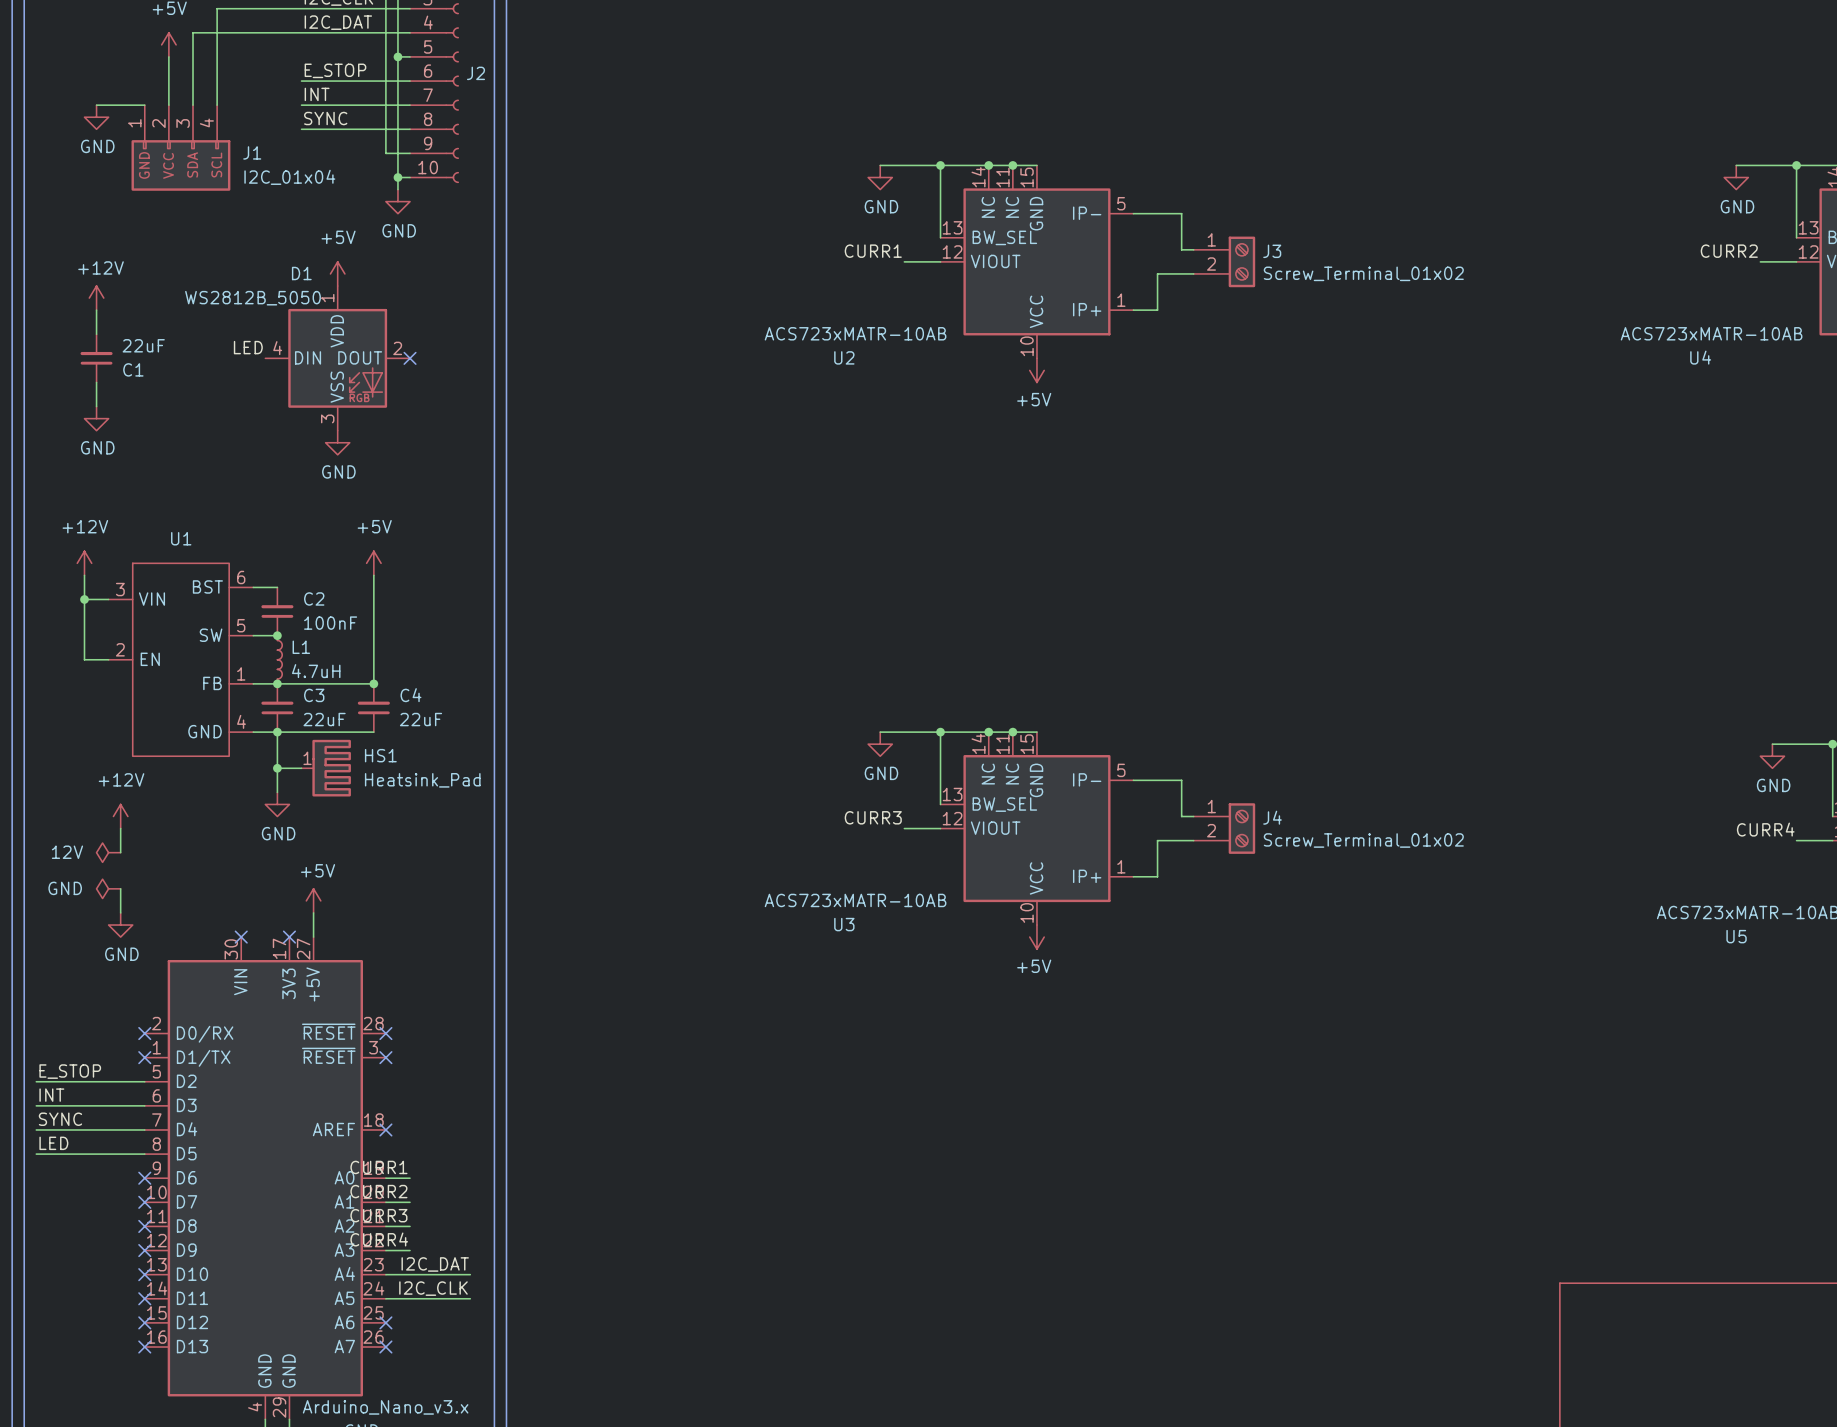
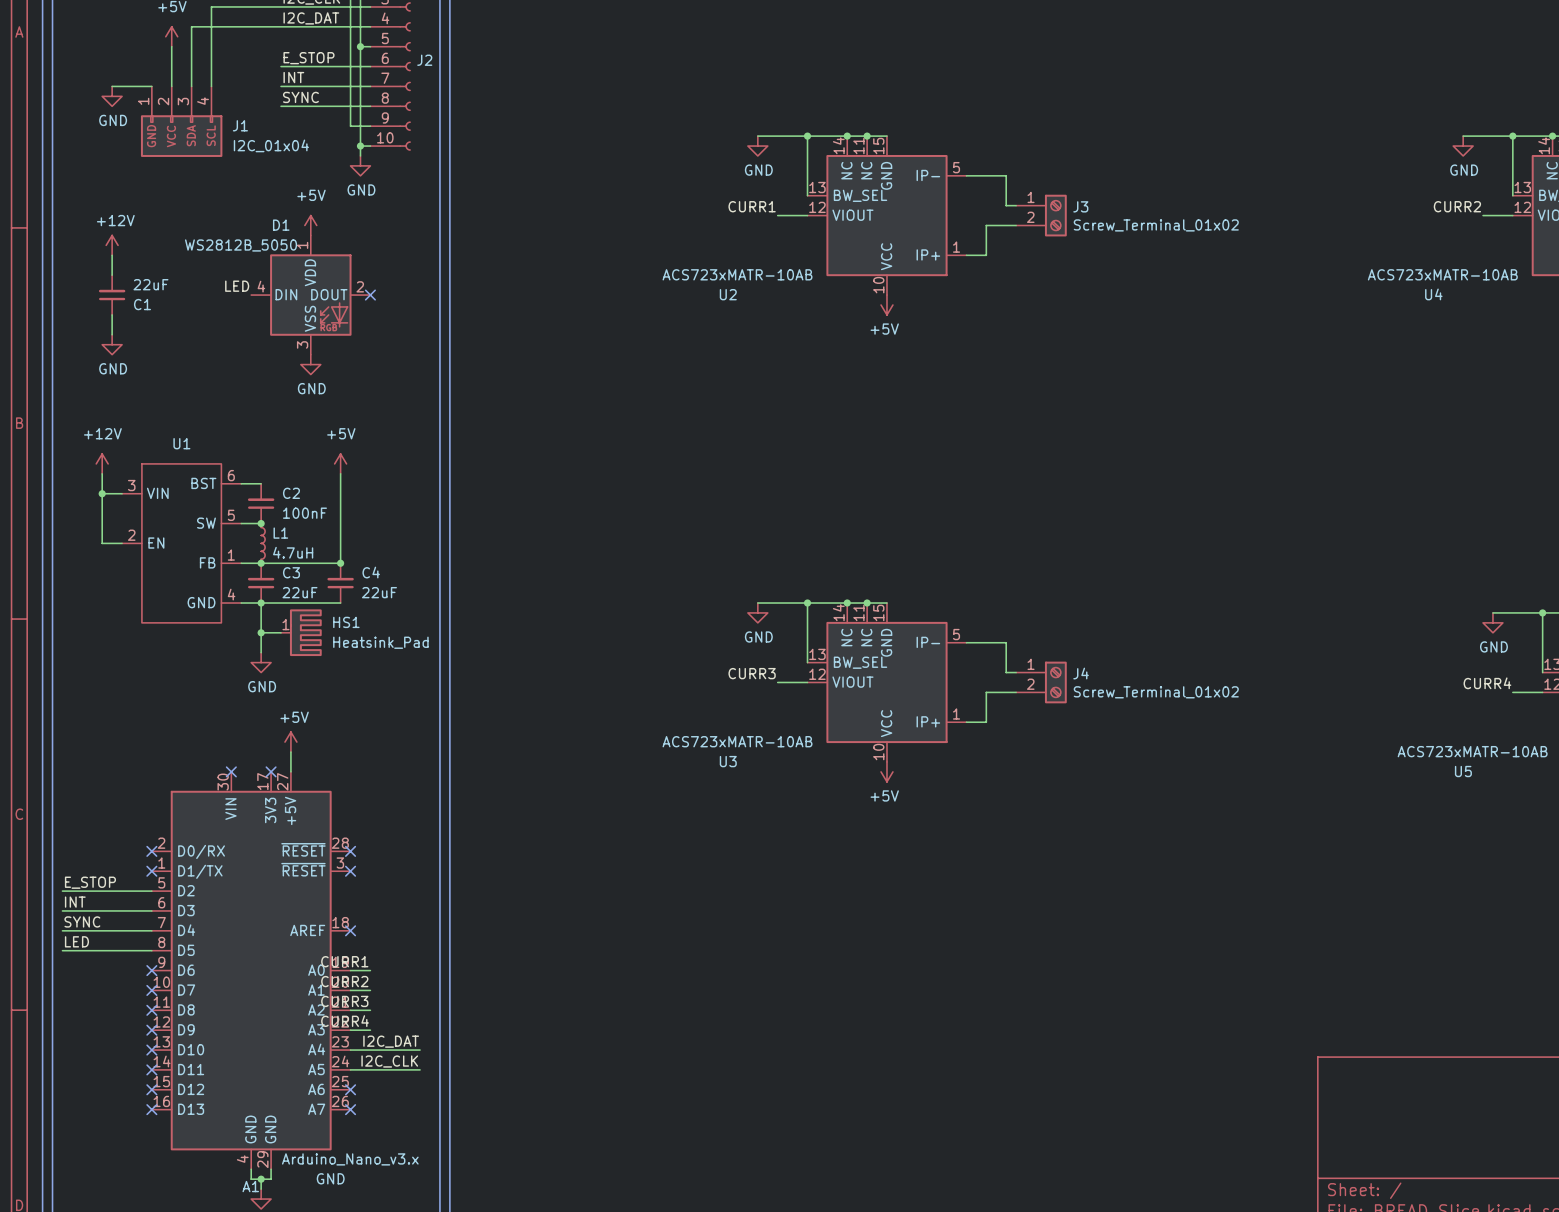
power symbol: +12V (120, 816) -> none
wire: (120, 828) (120, 852) -> none
power symbol: 12V (108, 852) -> none
power symbol: GND (108, 888) -> none
wire: (120, 888) (120, 912) -> none
power symbol: GND (120, 925) -> none

